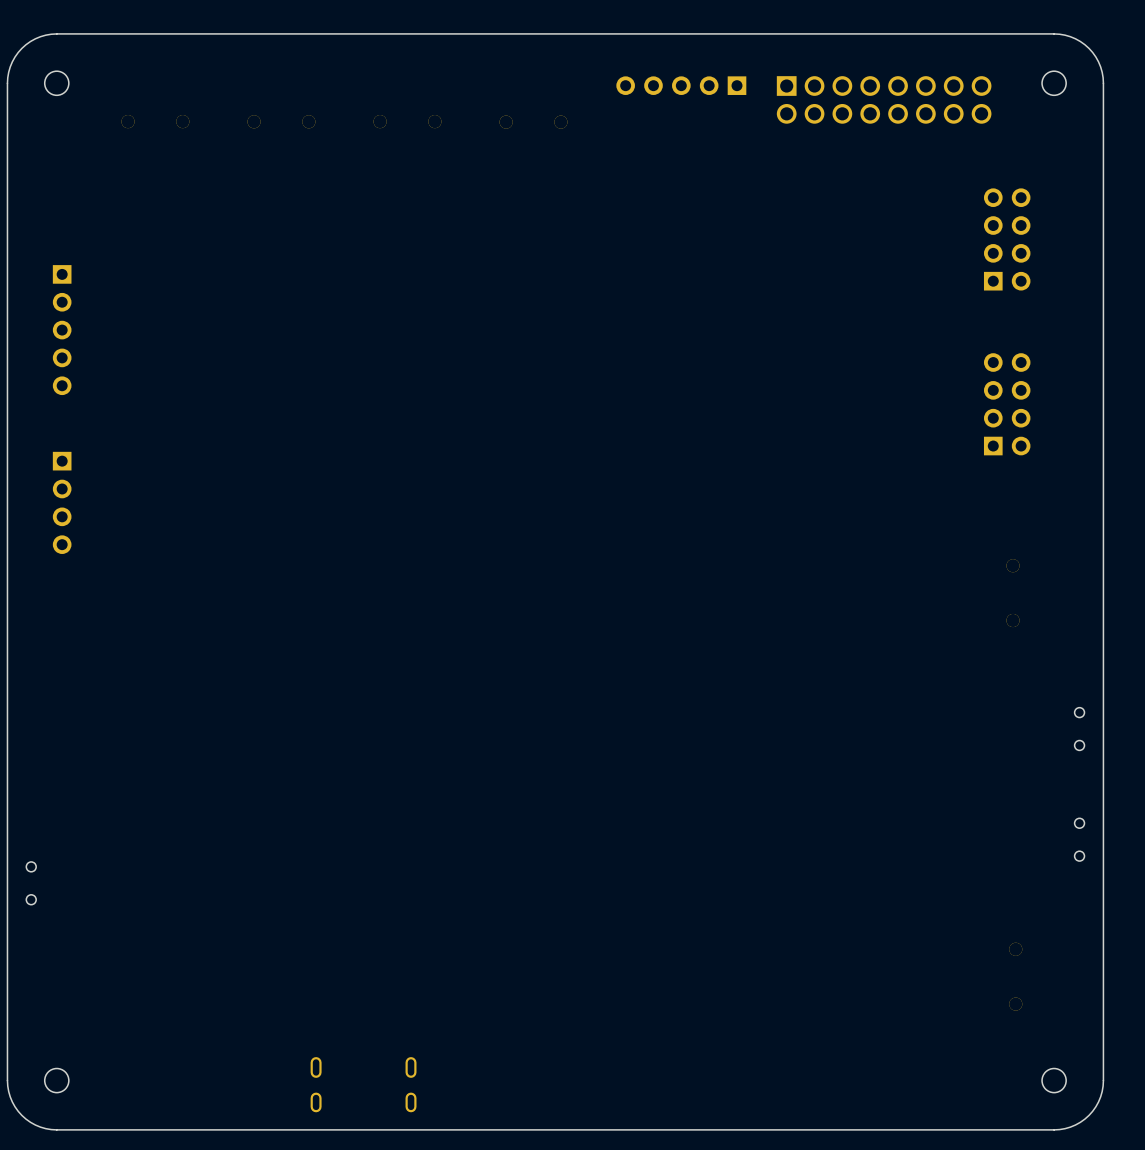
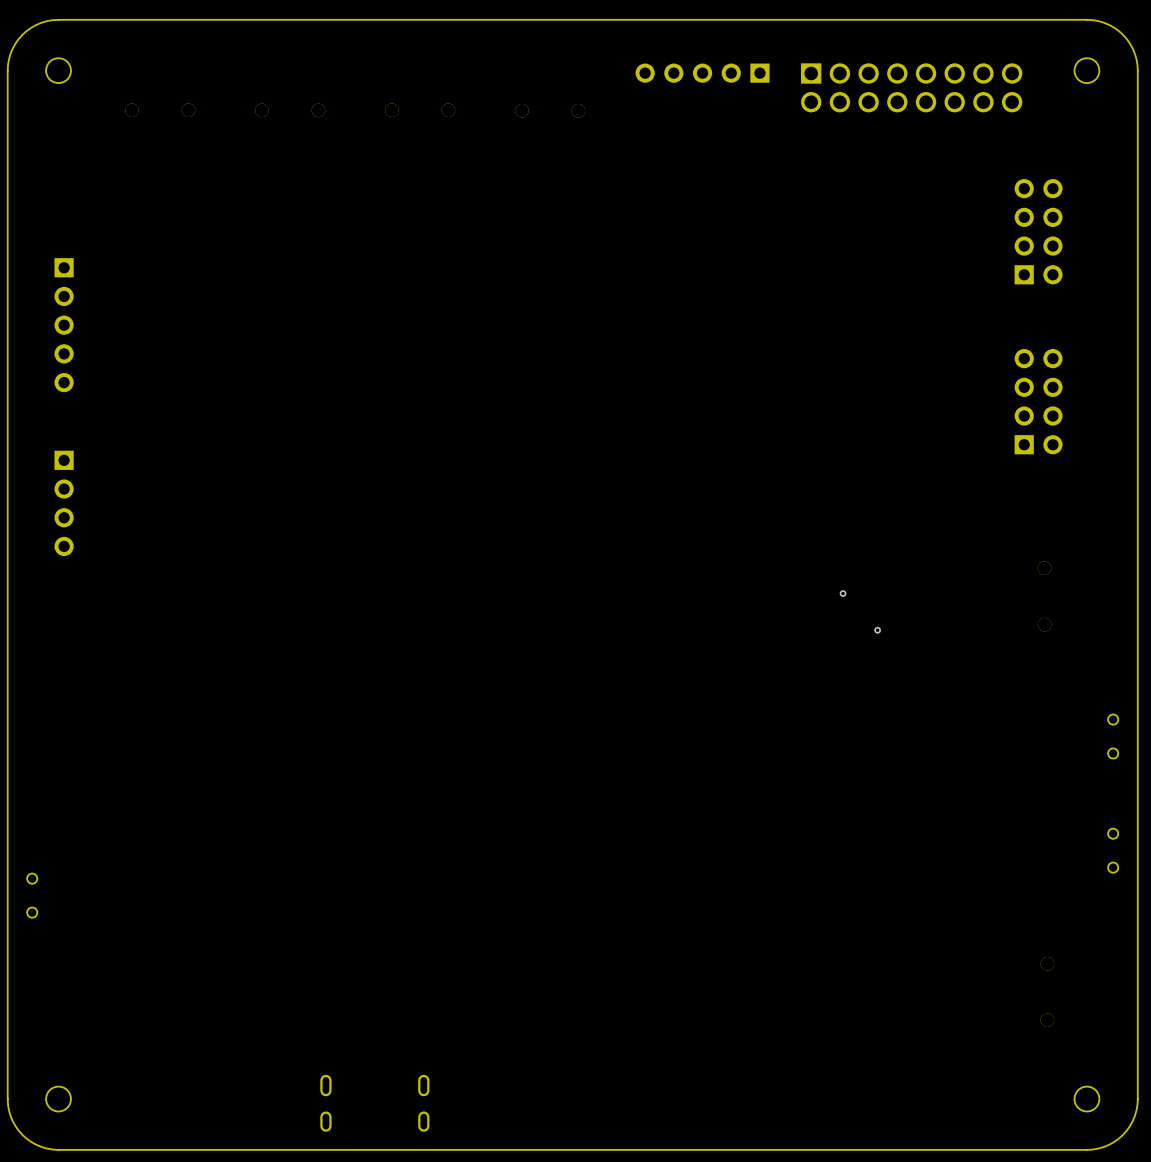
via: none -> (843, 593)
via: none -> (877, 630)

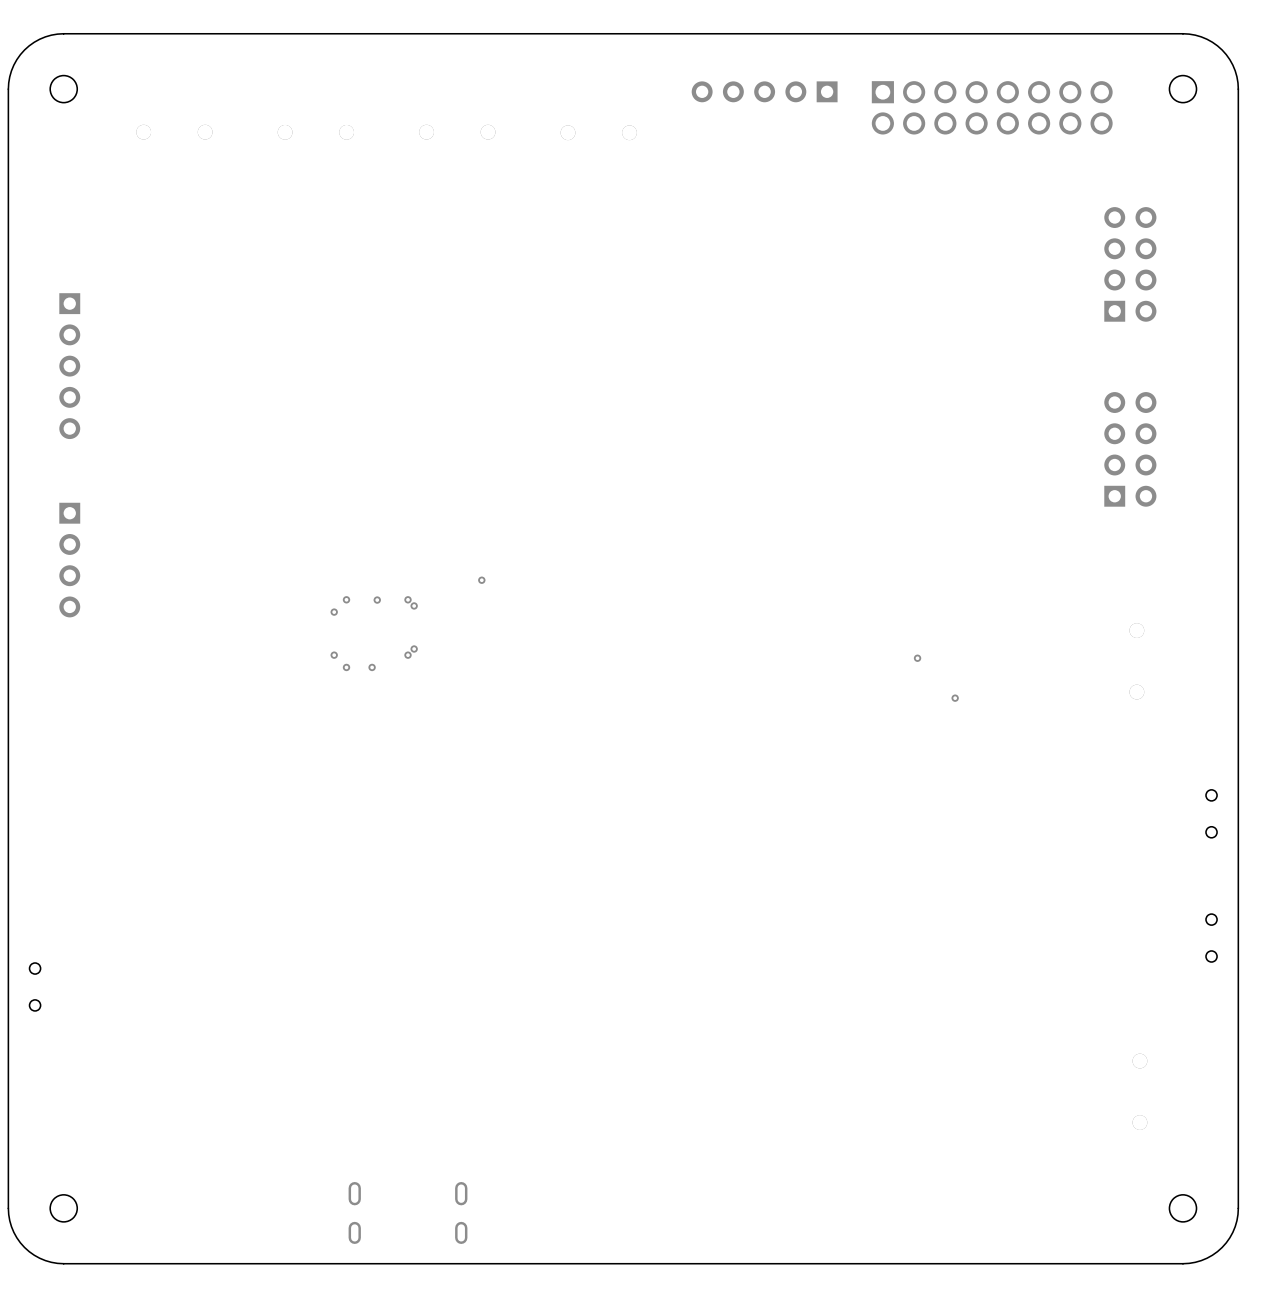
via: none -> (481, 580)
via: none -> (346, 599)
via: none -> (408, 599)
via: none -> (377, 600)
via: none -> (414, 605)
via: none -> (334, 612)
via: none -> (414, 649)
via: none -> (334, 655)
via: none -> (408, 655)
via: none -> (346, 667)
via: none -> (372, 667)

